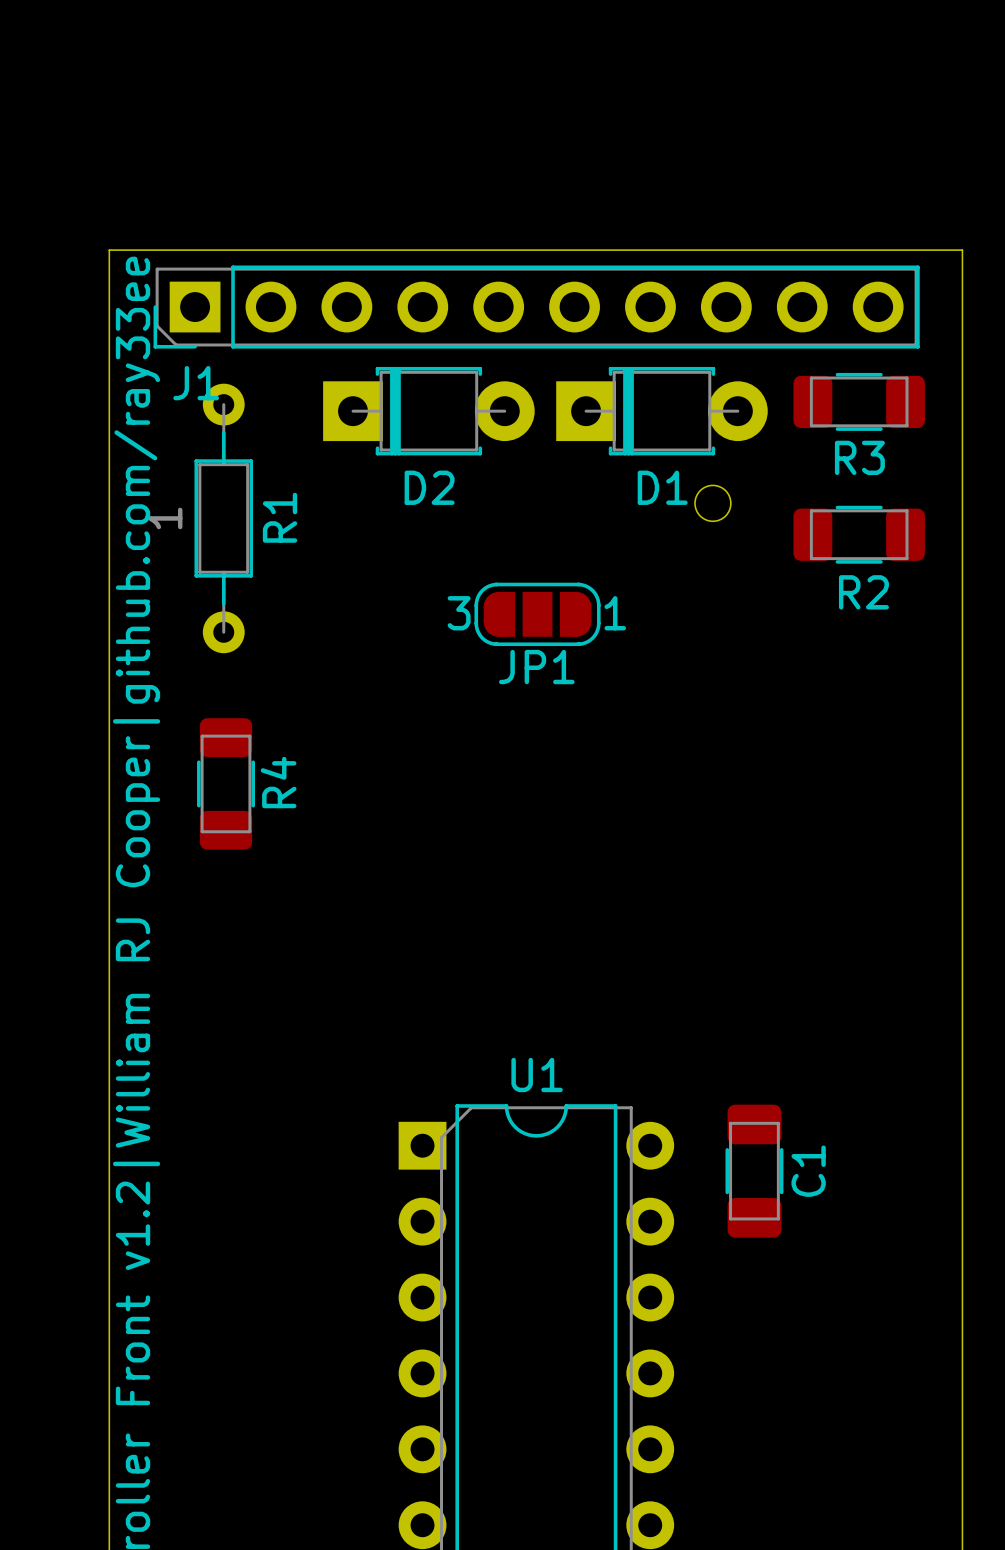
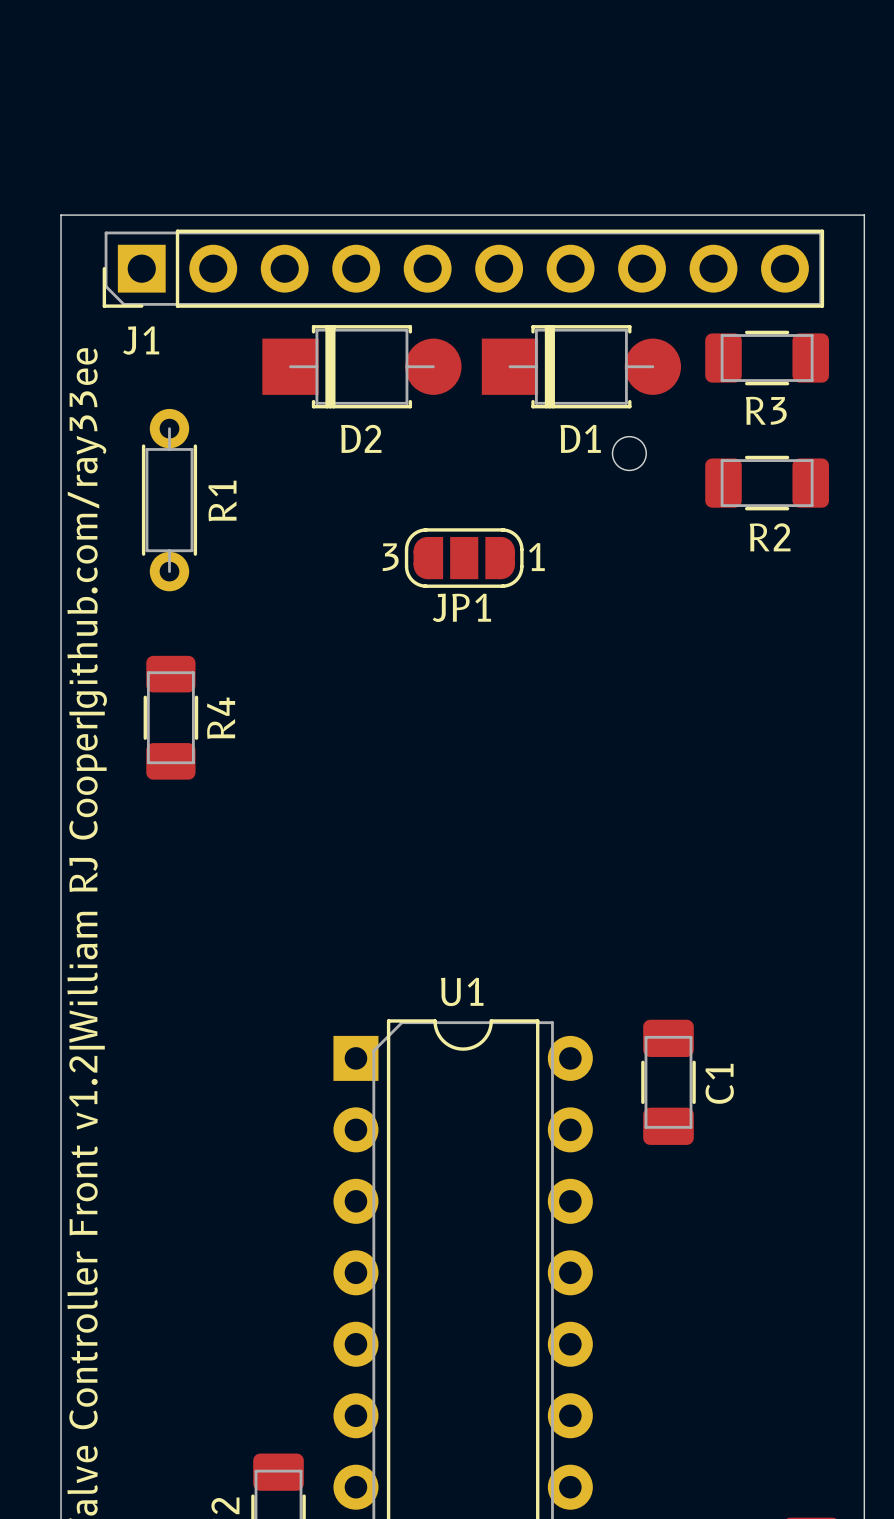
D2 footprint: [323, 366, 535, 456] -> [262, 325, 462, 409]
D1 footprint: [556, 366, 768, 456] -> [481, 325, 682, 409]
R1 footprint: [194, 383, 254, 654] -> [141, 408, 198, 592]
R1 value: 1 (165, 518) -> none

